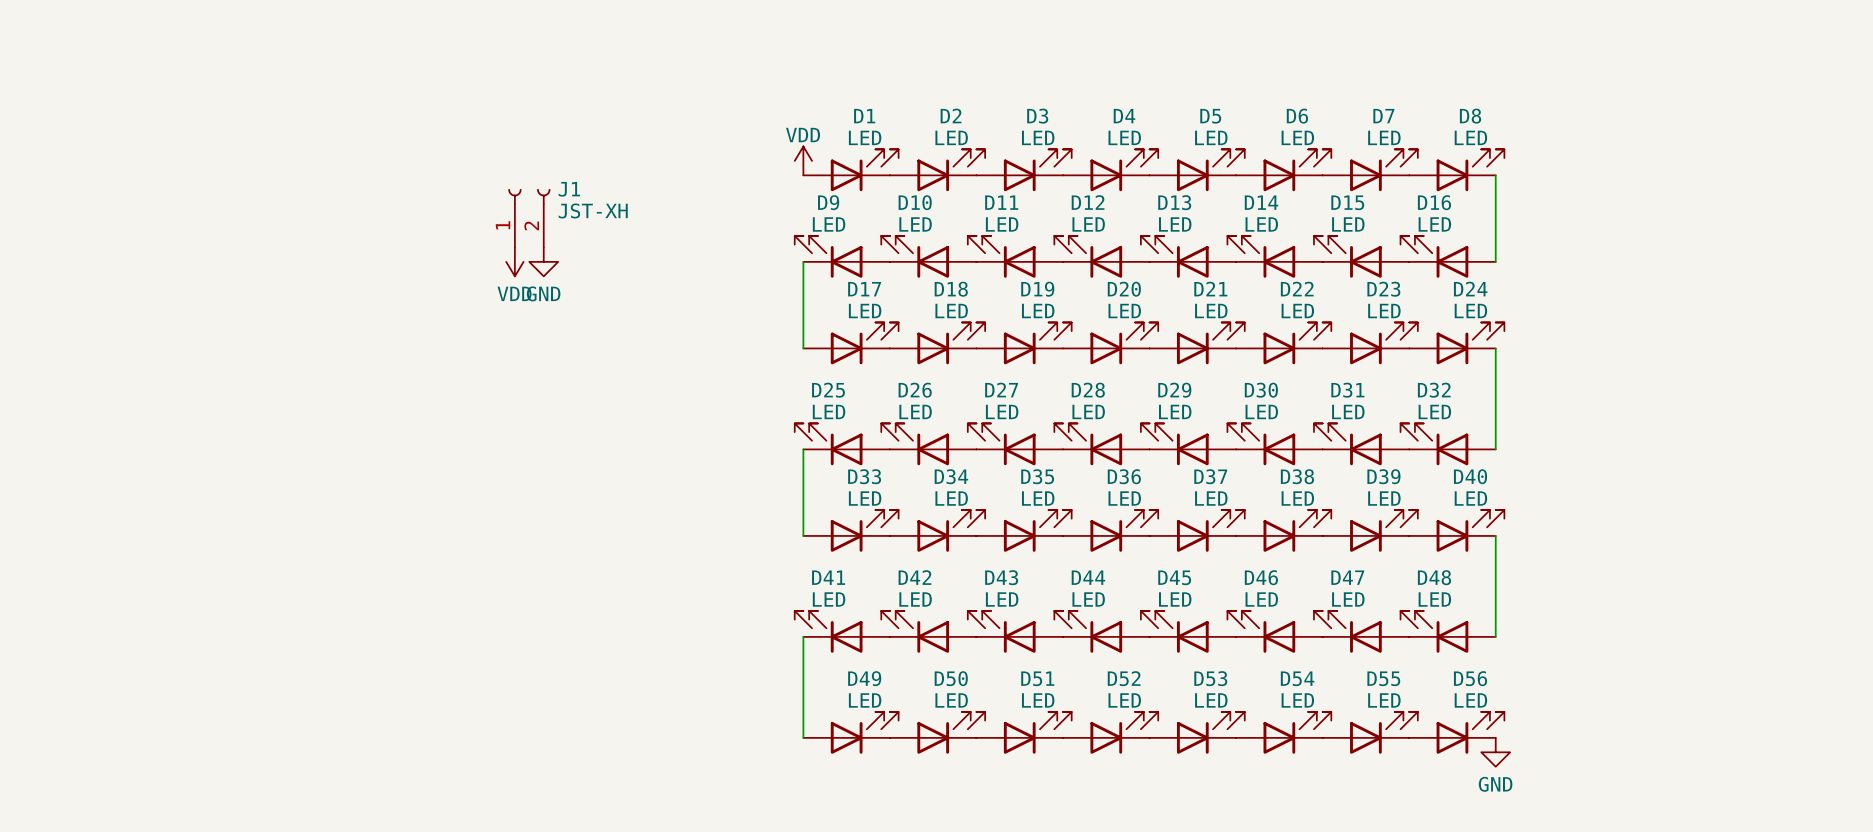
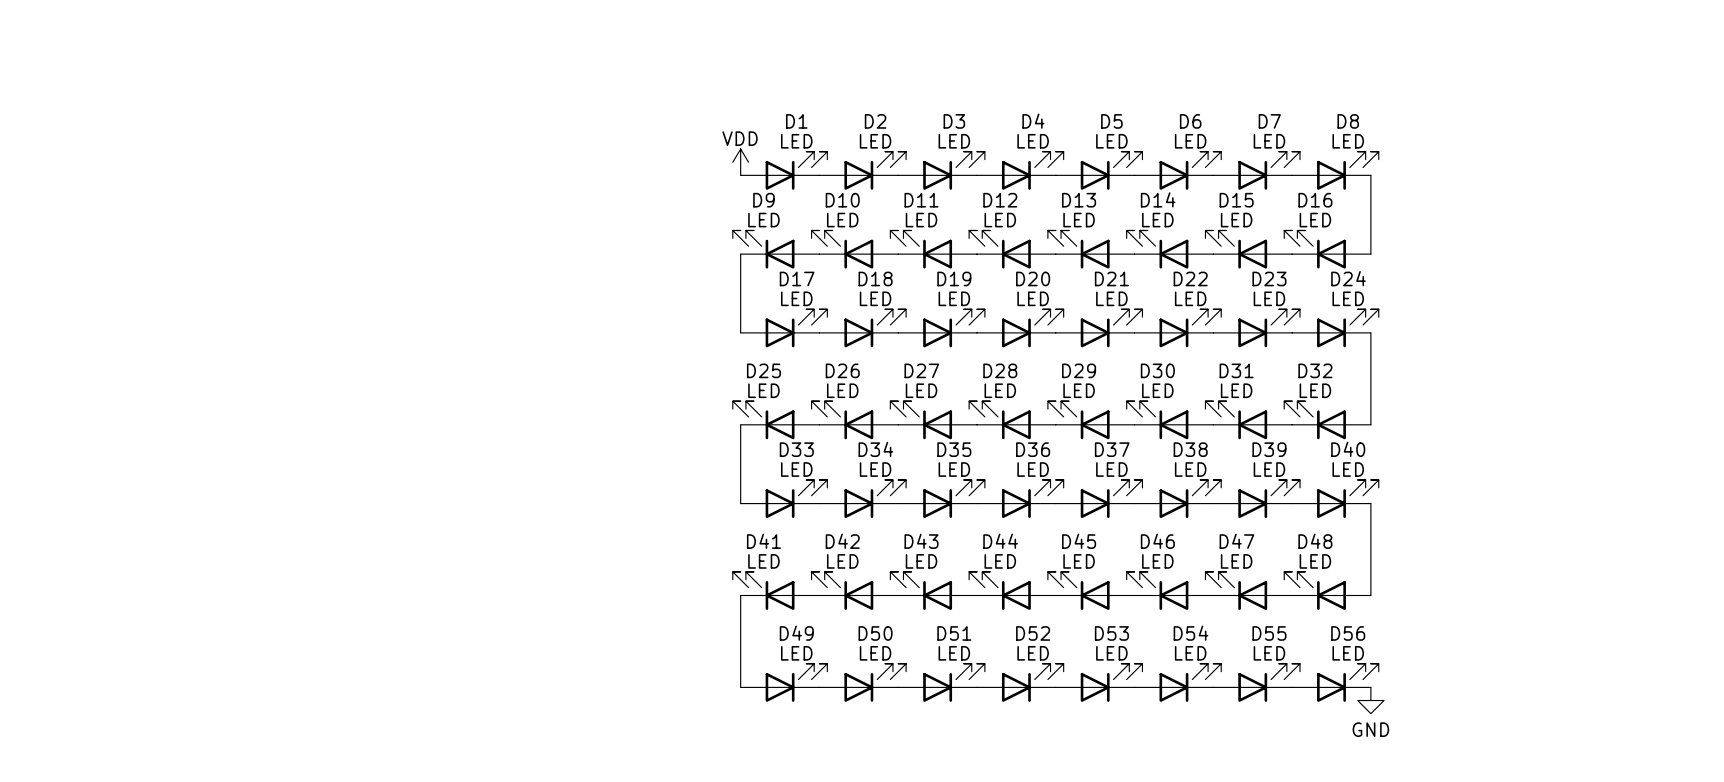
J1: JST-XH (529, 218) -> none
power symbol: VDD (514, 261) -> none
power symbol: GND (543, 261) -> none

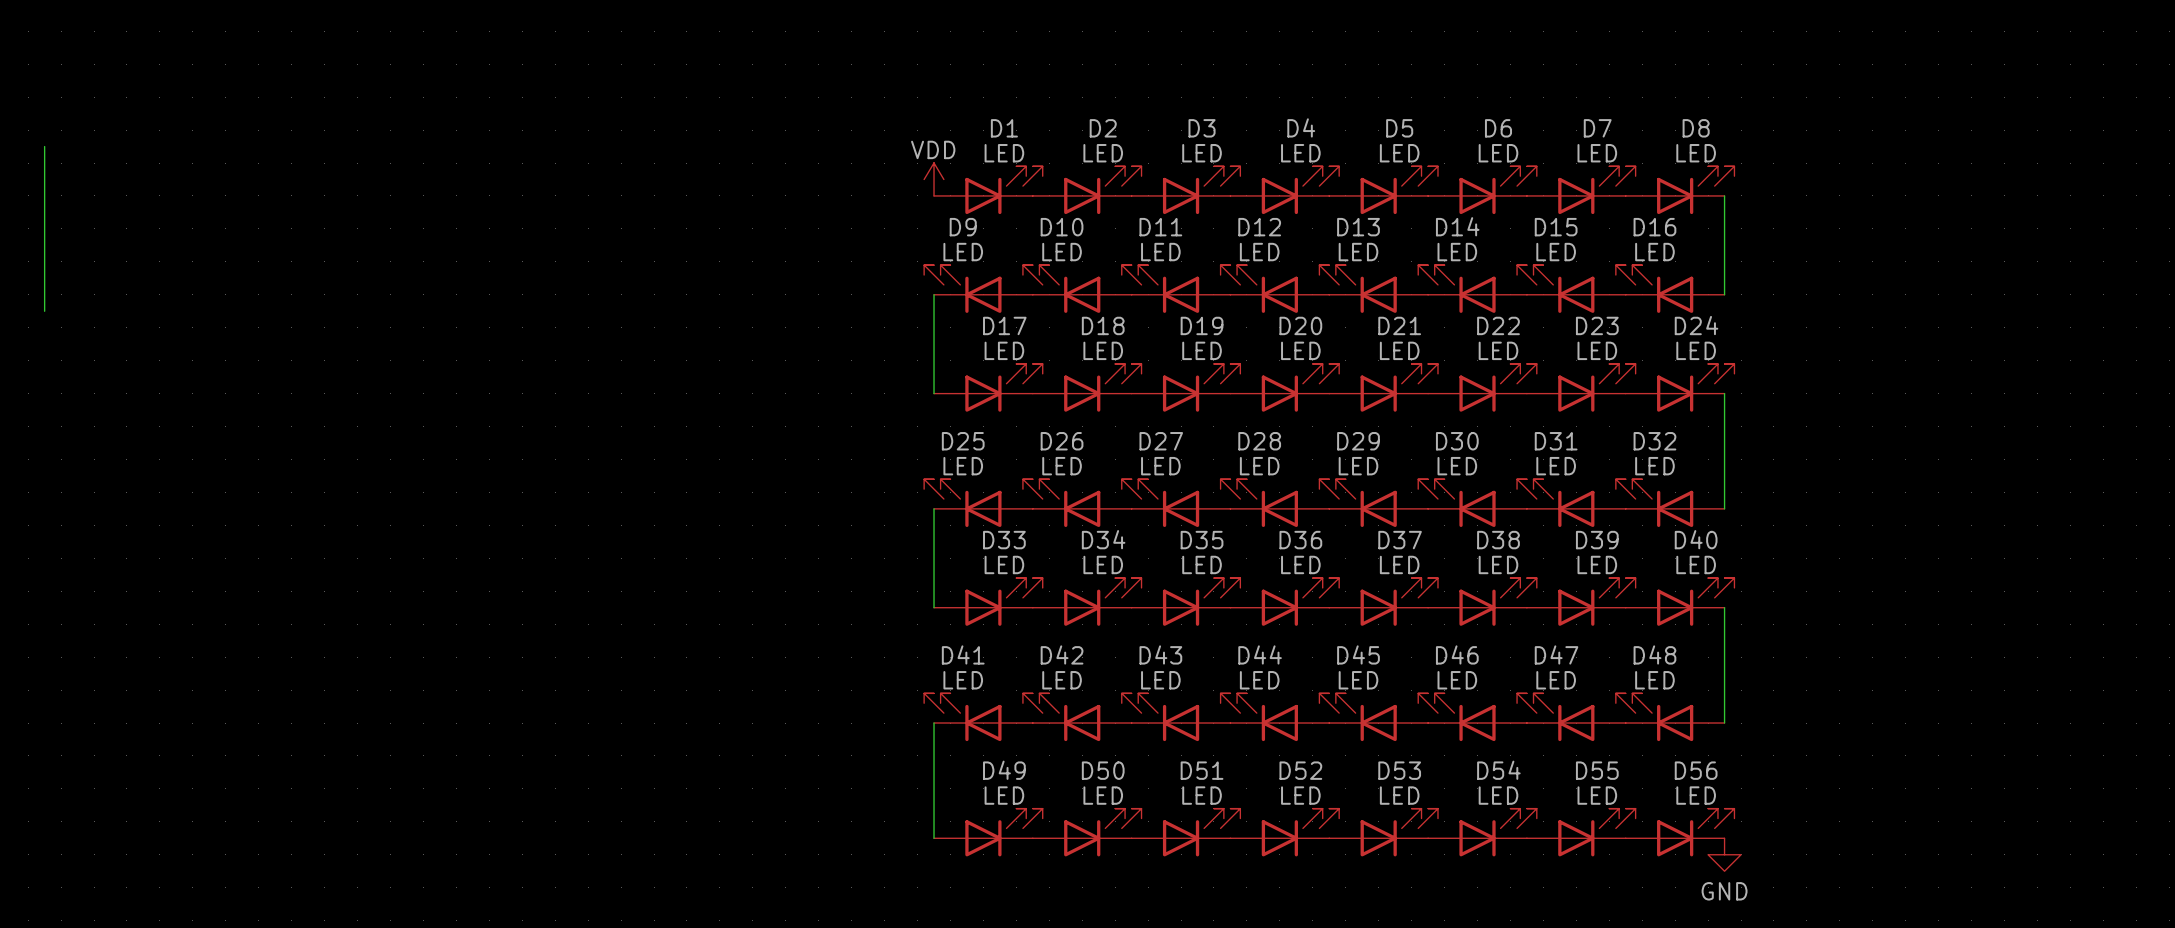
wire: none -> (44, 146) (44, 311)

